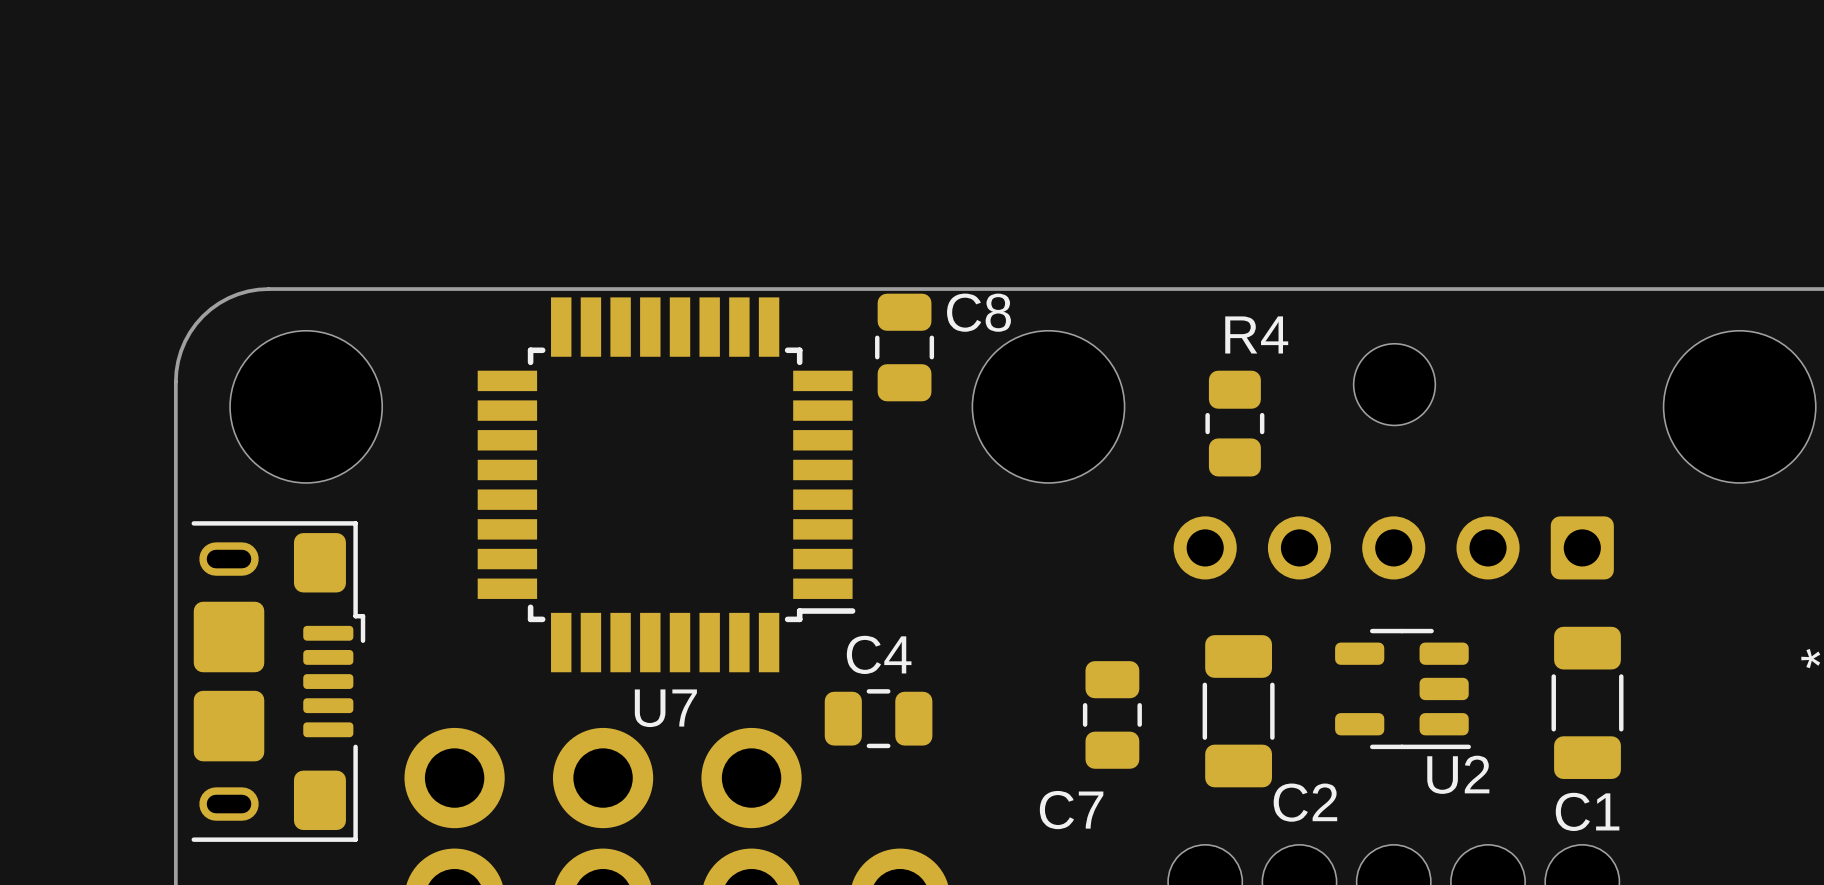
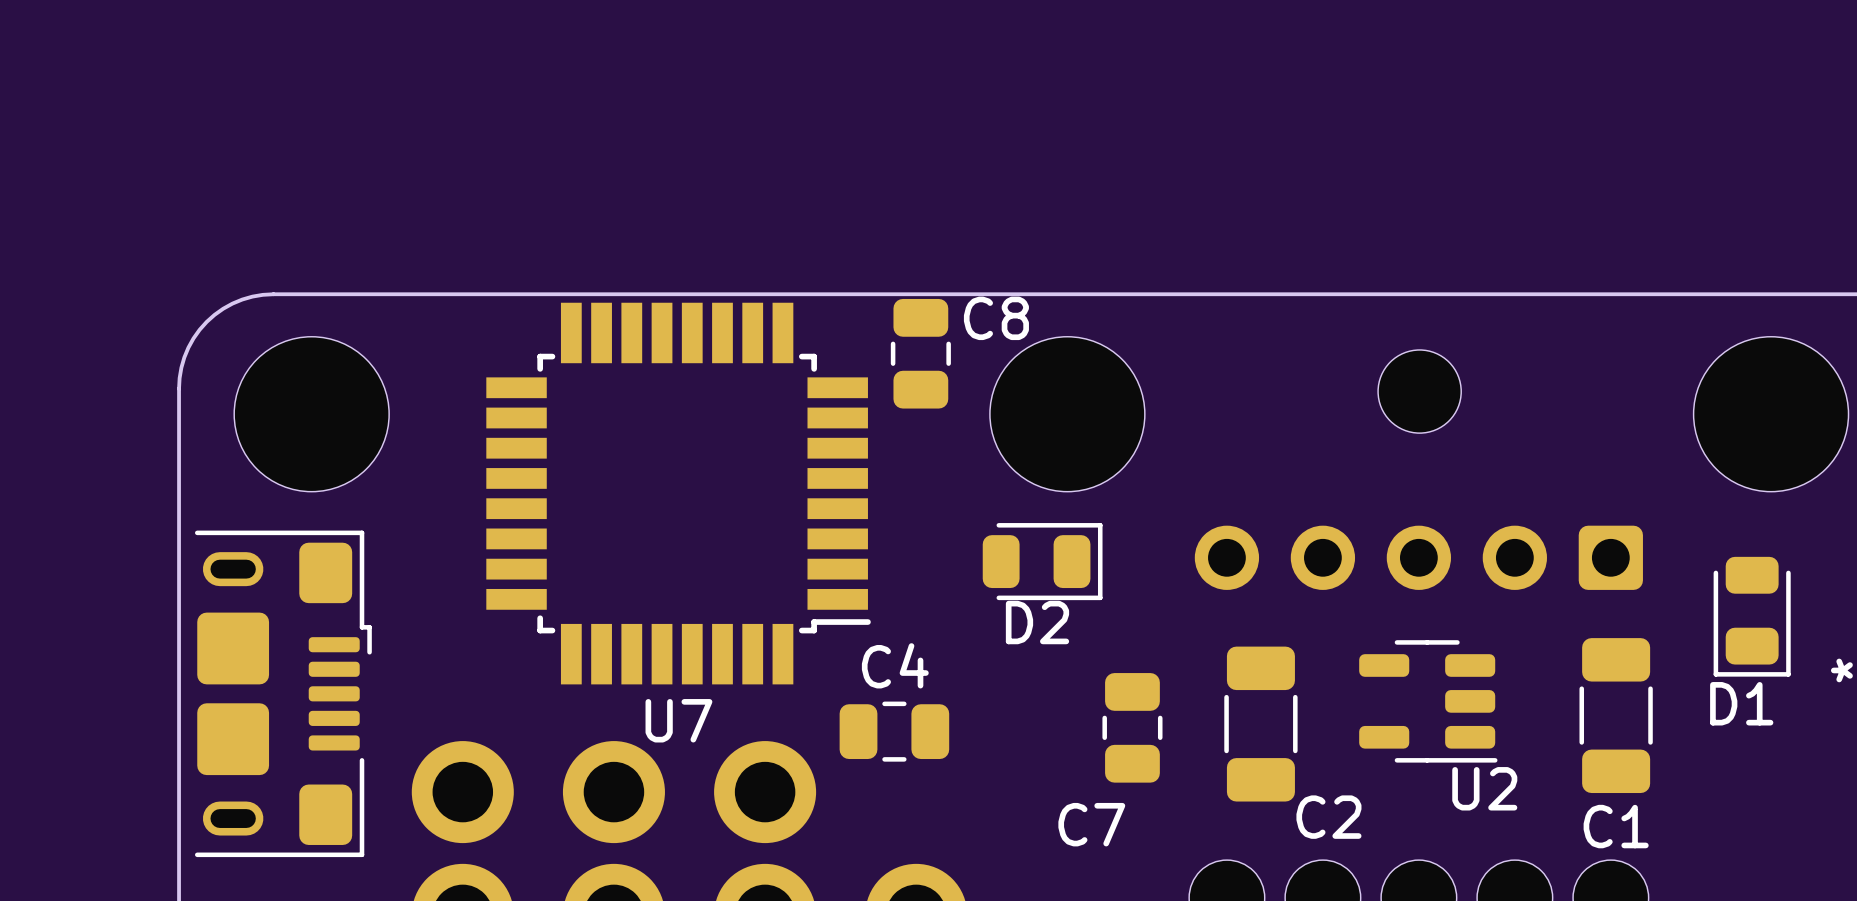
R4: (1234, 423) -> none
D2: none -> (1042, 561)
D1: none -> (1752, 616)

